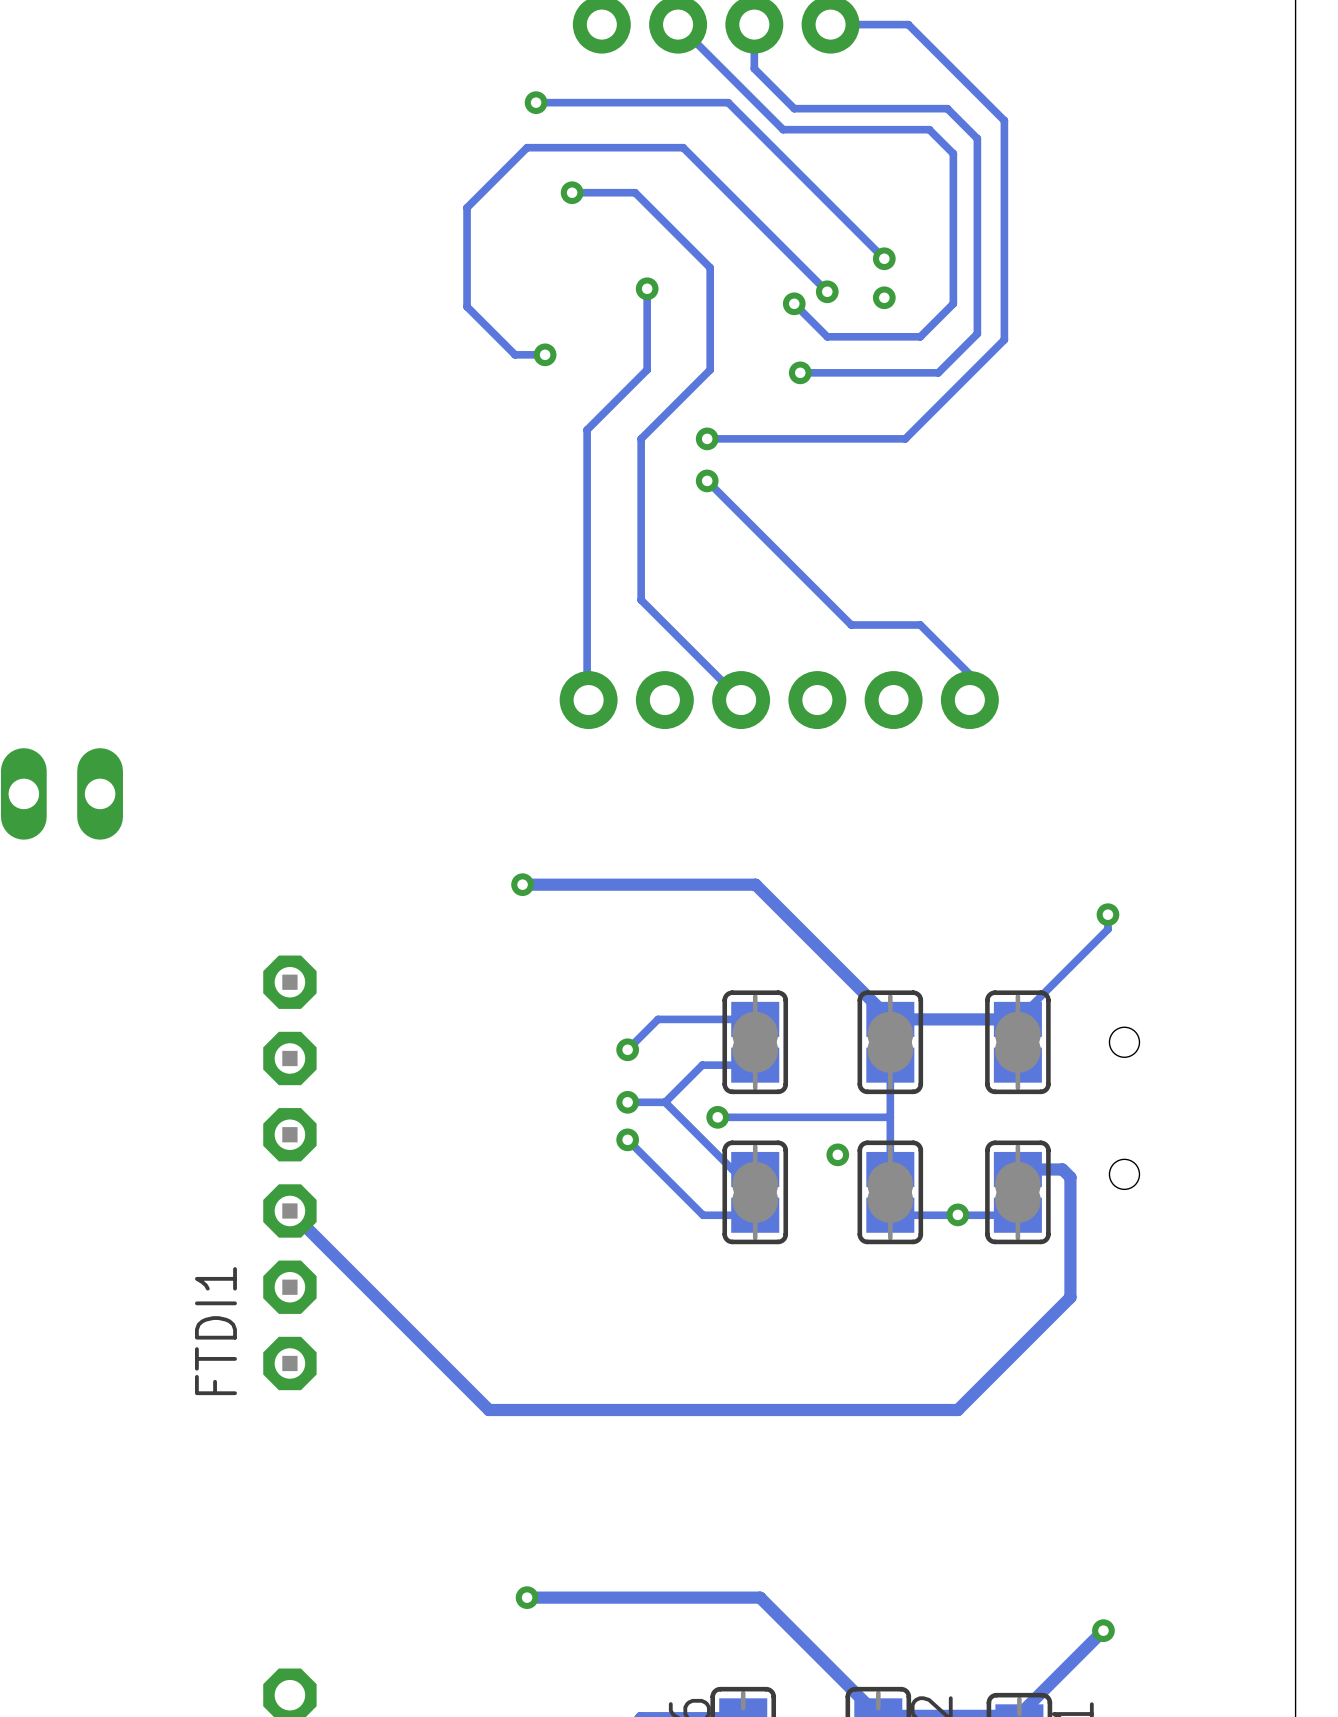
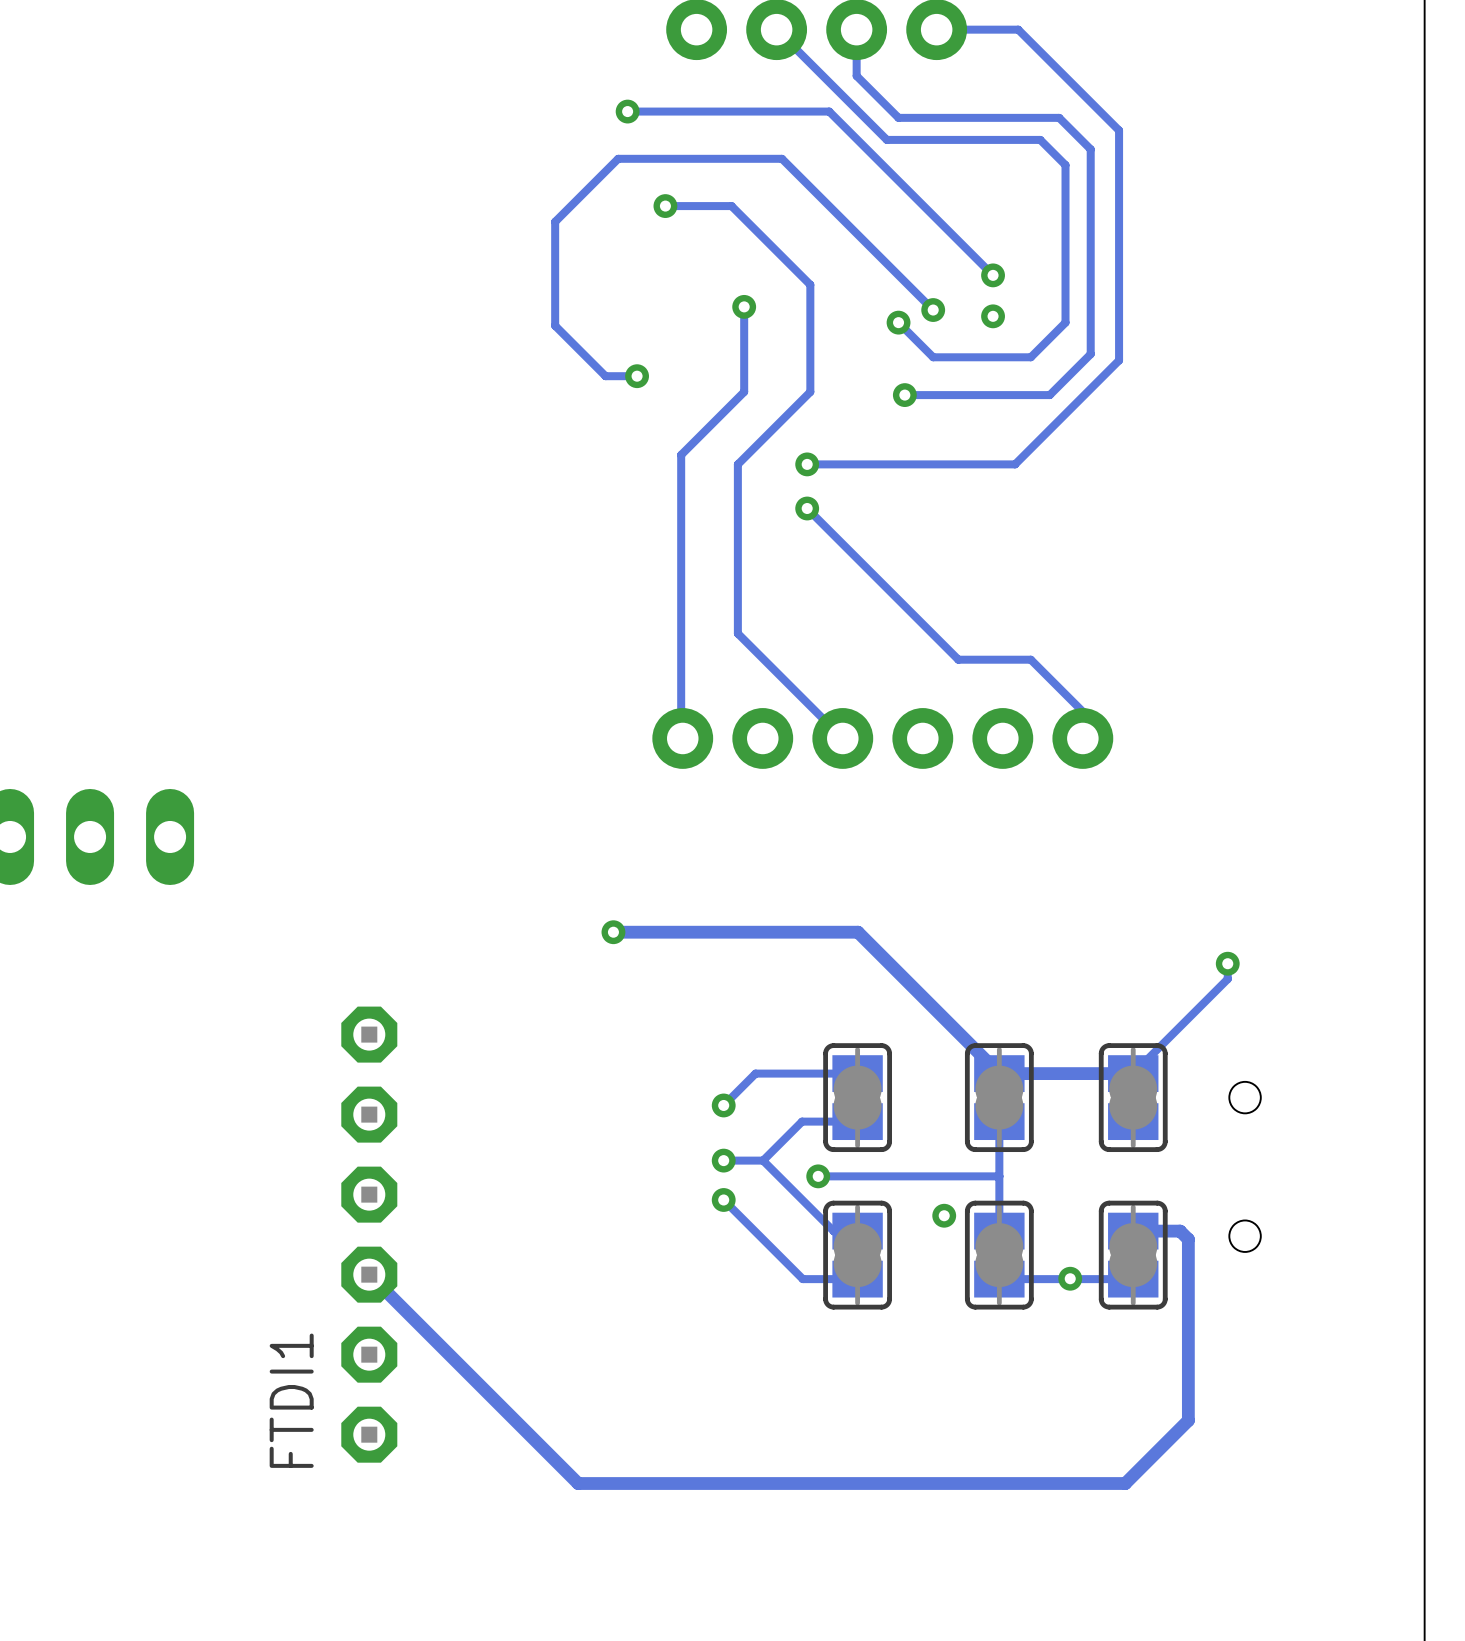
track: (1070, 1297) (957, 1410) -> (1188, 1365) (1188, 1420) (1125, 1483) (1070, 1483)

